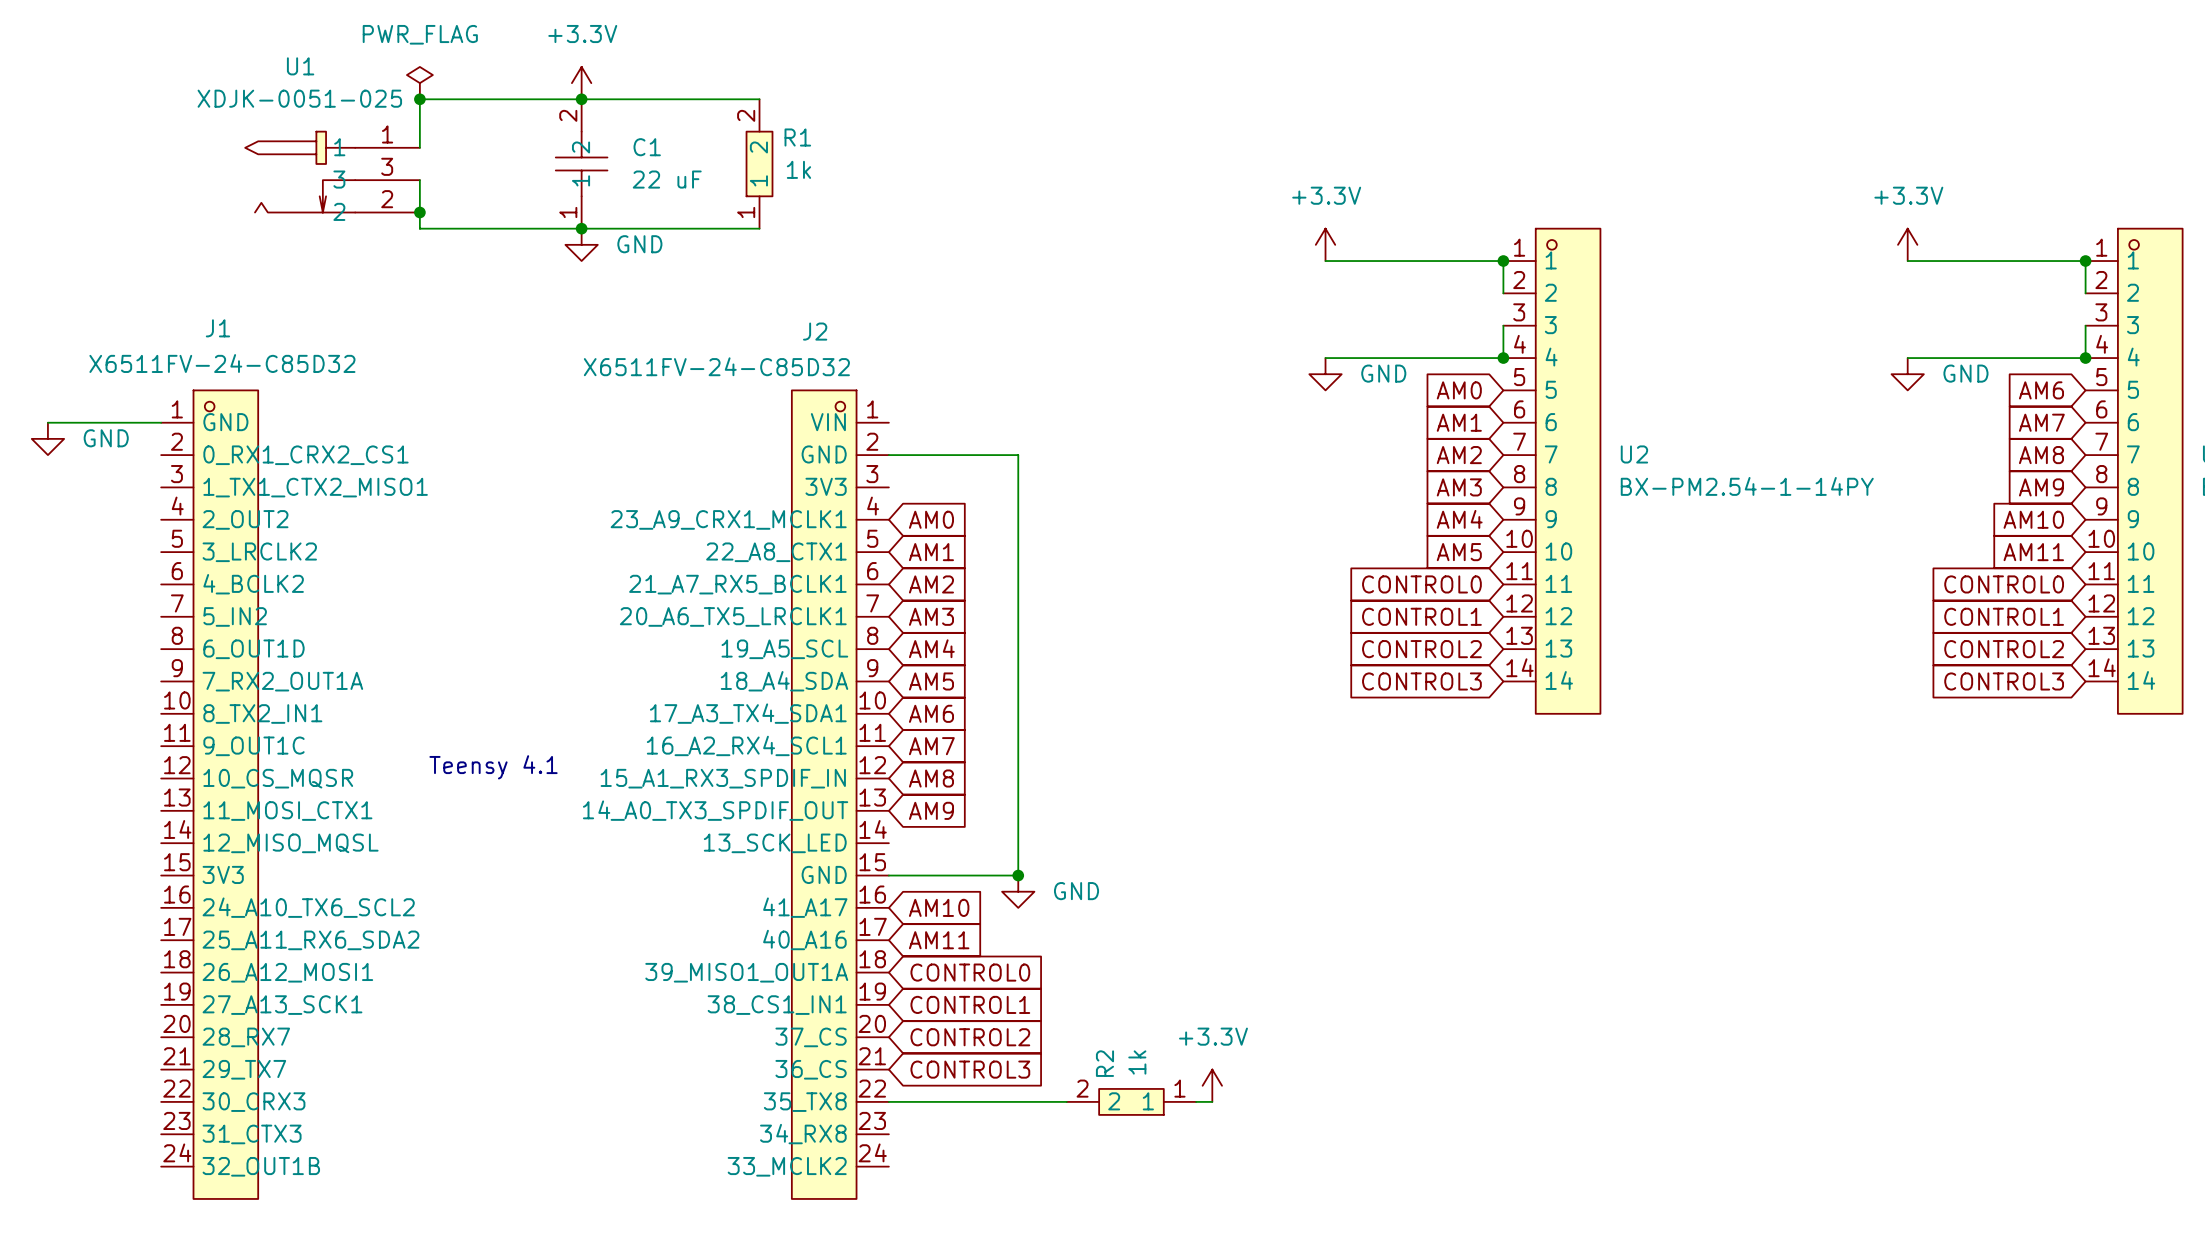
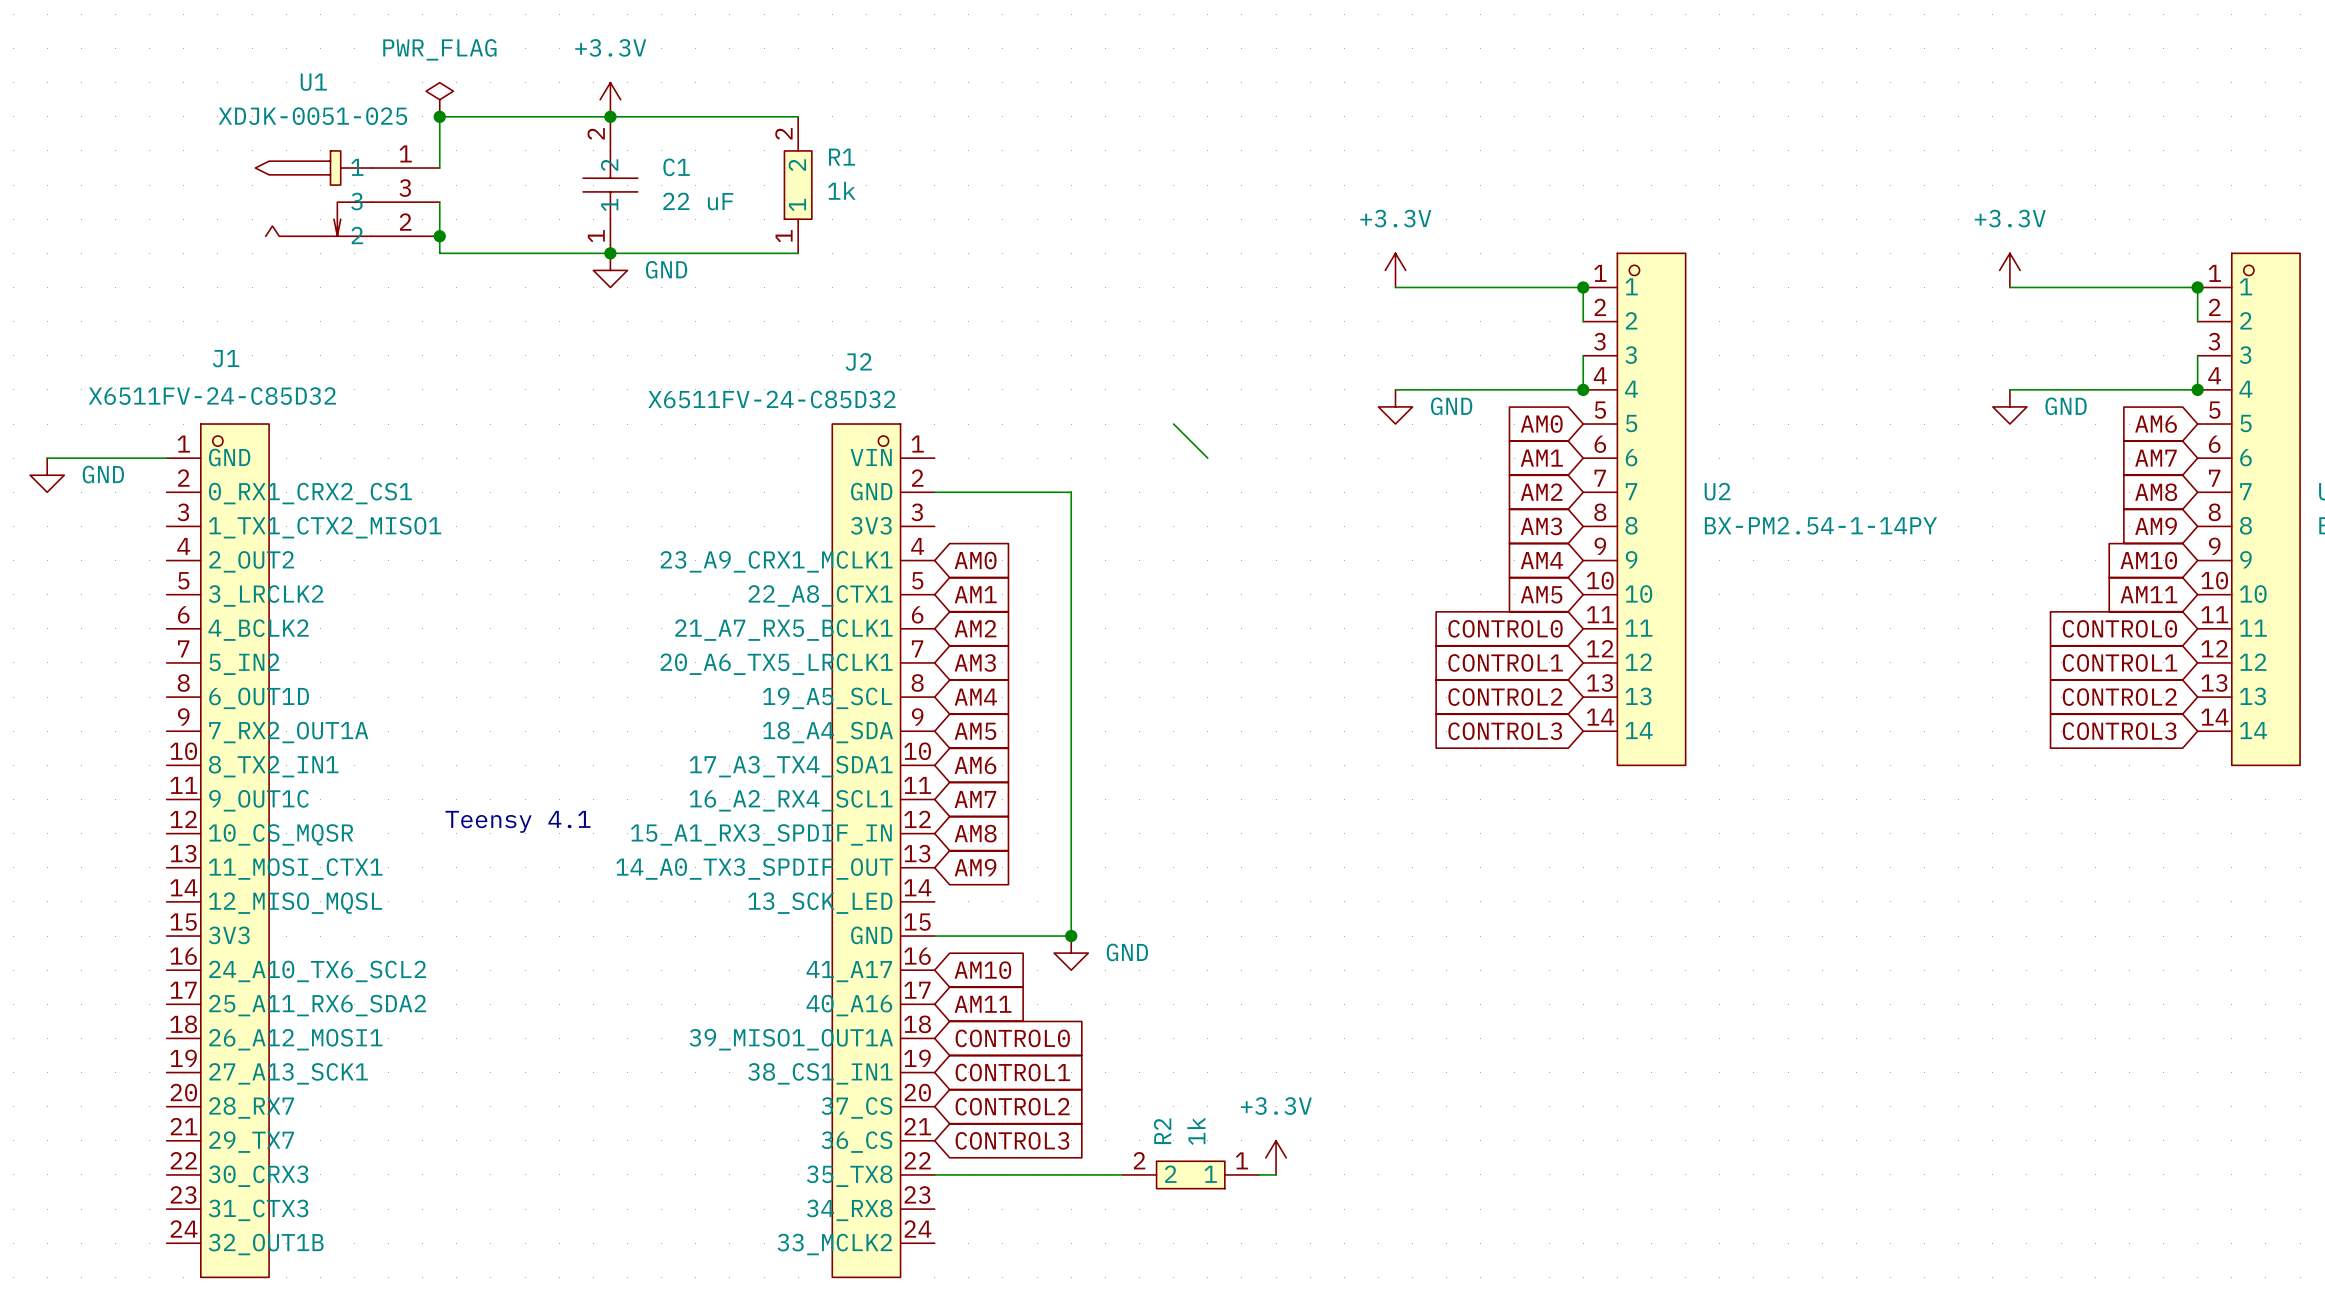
wire: none -> (1173, 424) (1207, 458)

